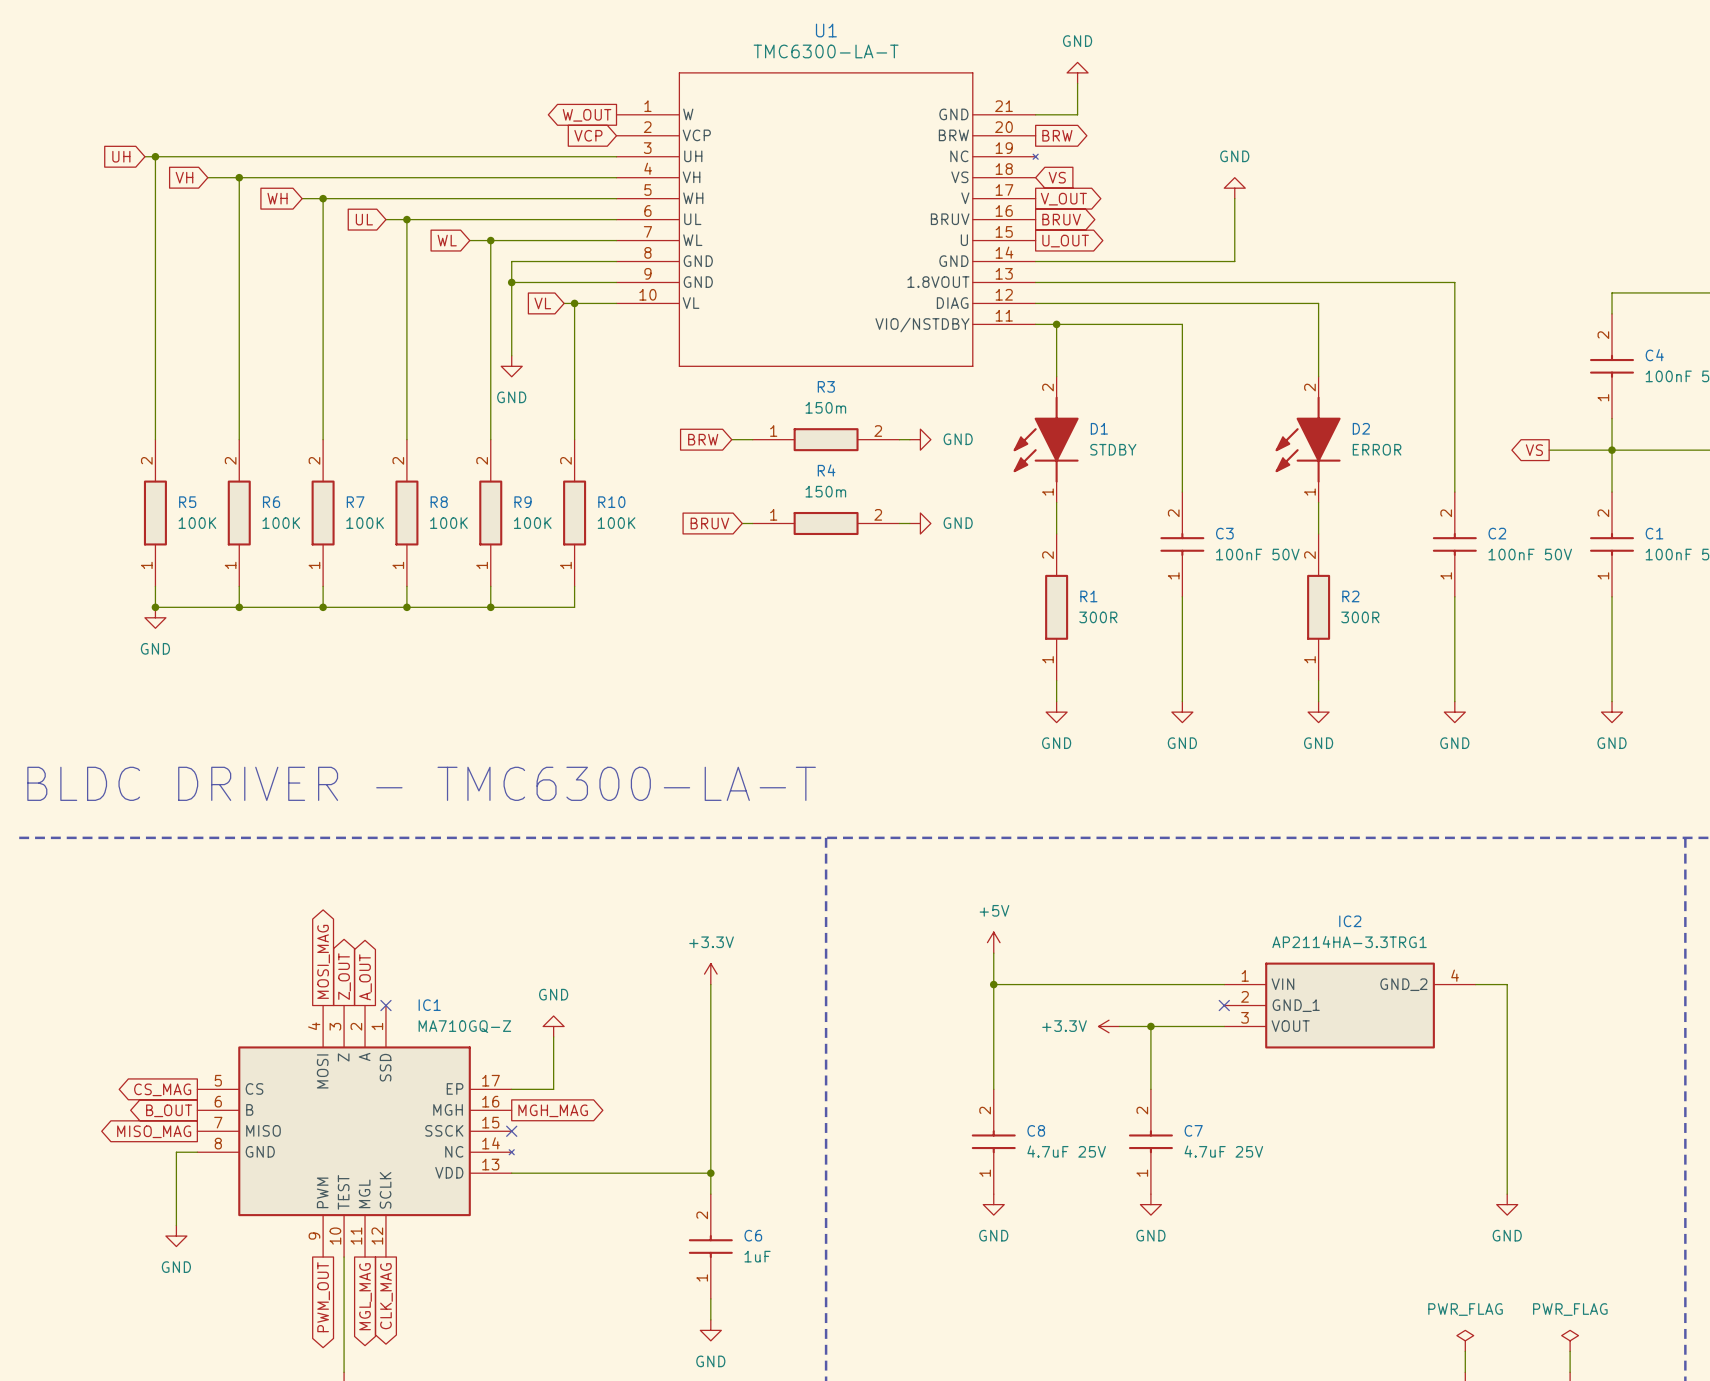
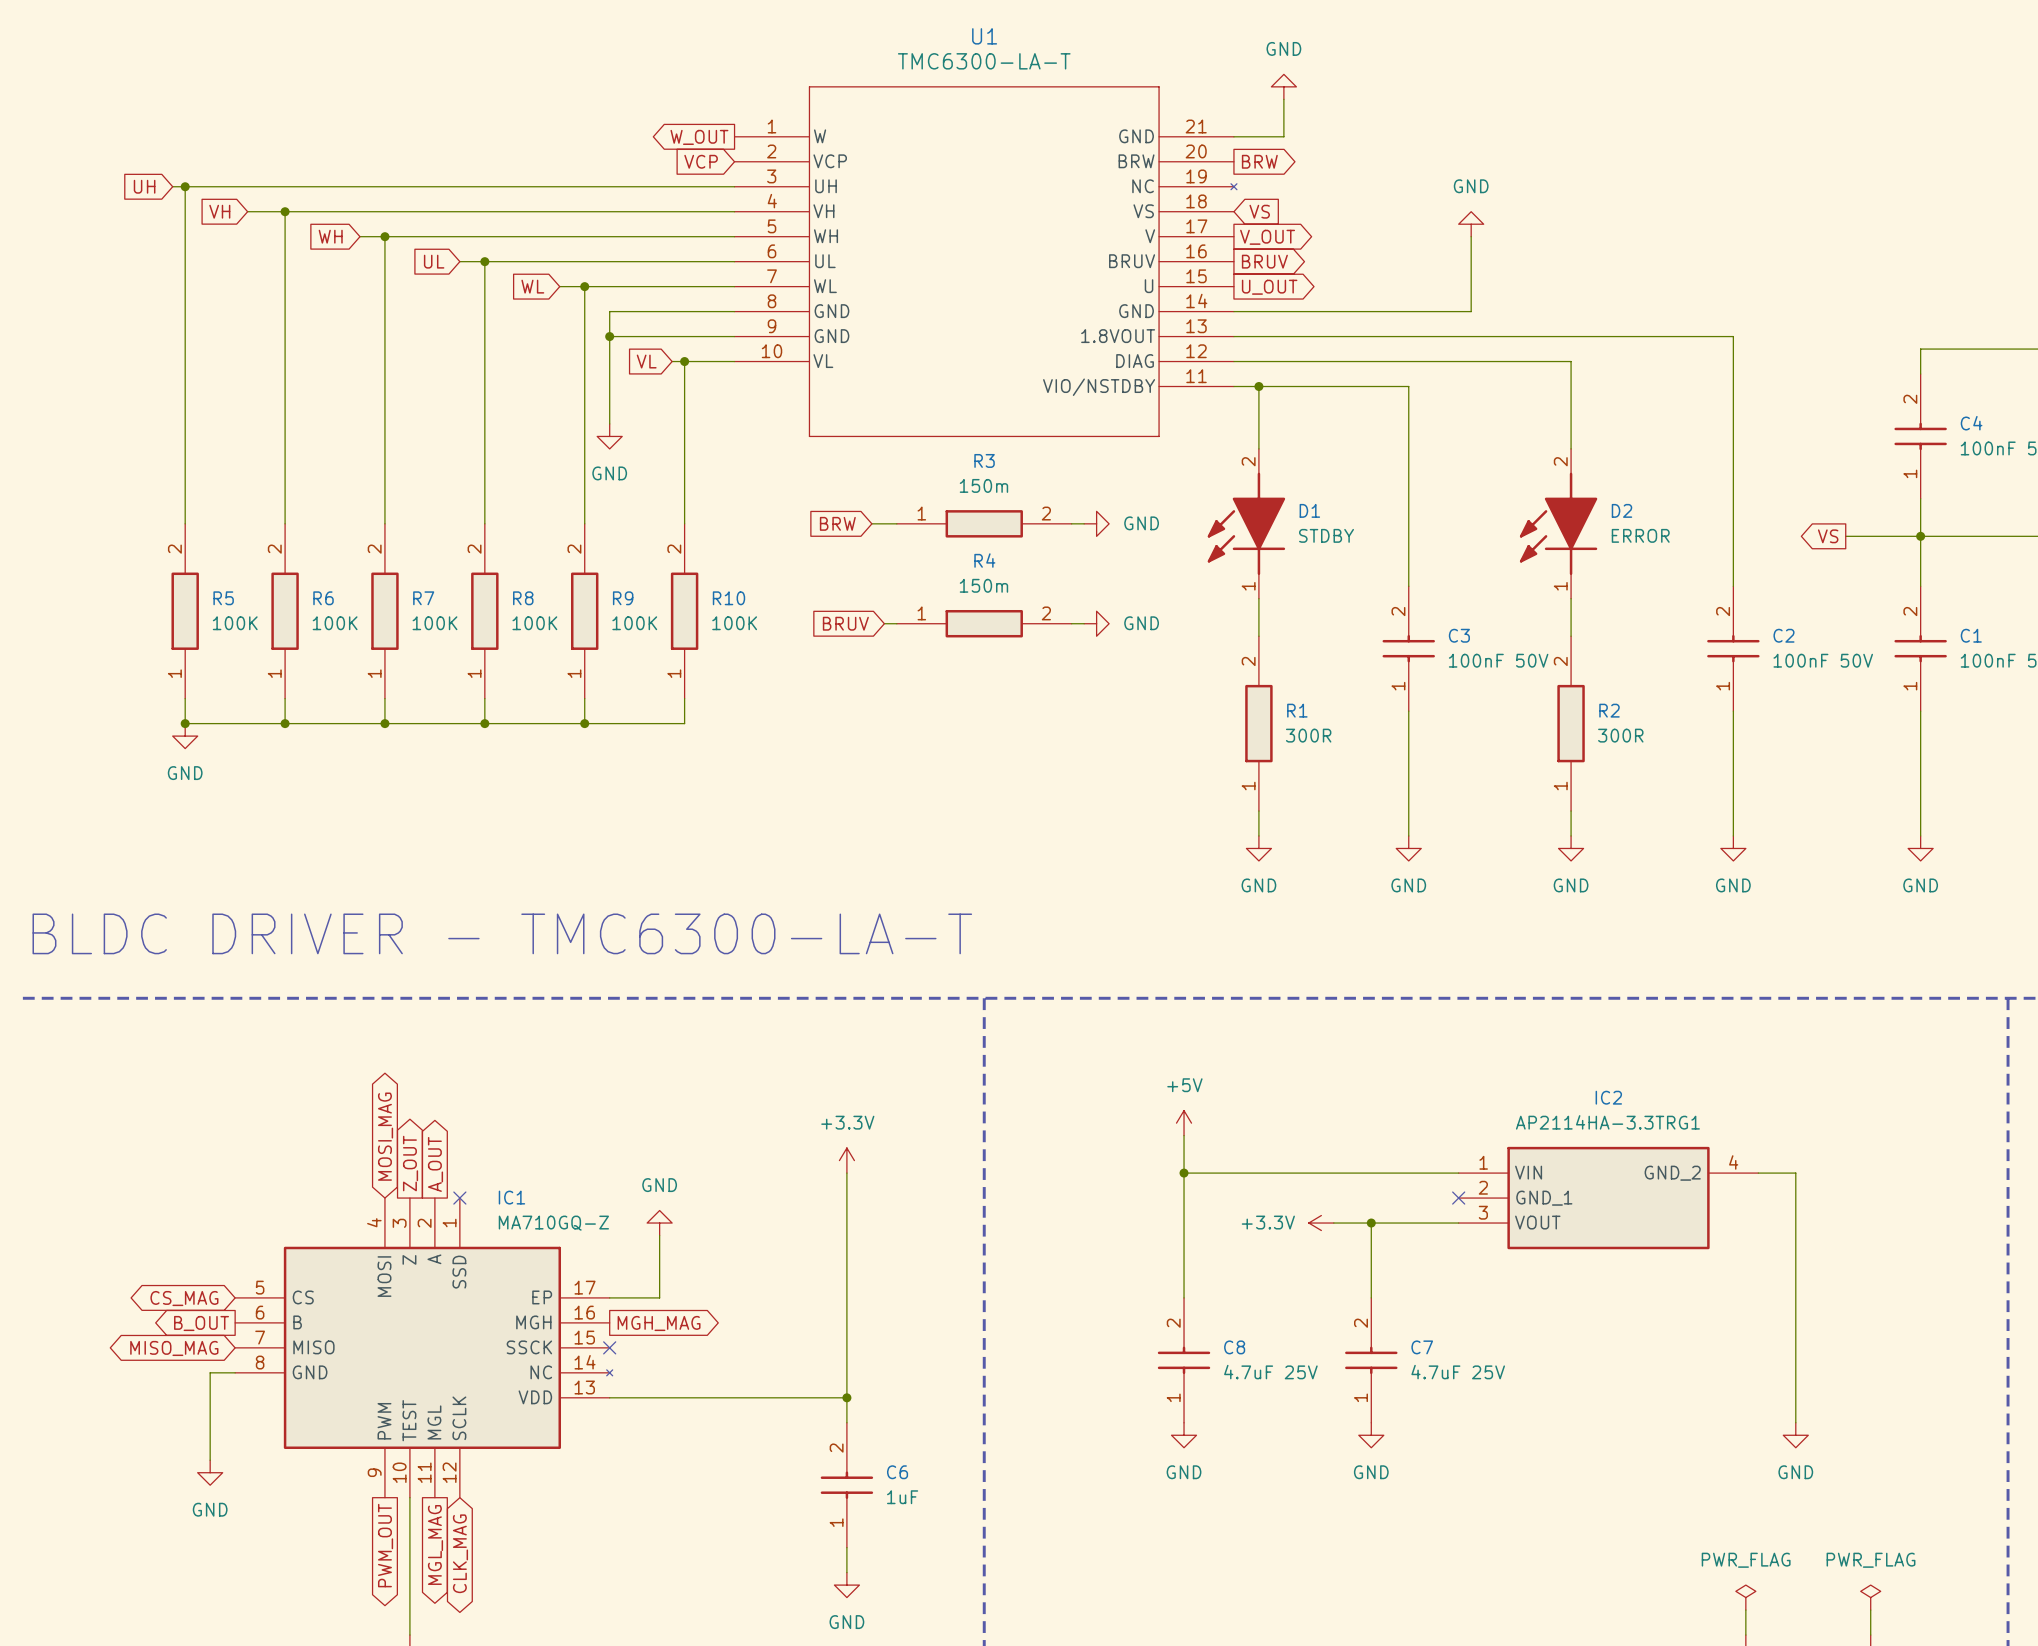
global label shape: output (323, 961) -> bidirectional (385, 1136)
global label shape: output (162, 1089) -> bidirectional (184, 1298)
global label shape: output (154, 1131) -> bidirectional (174, 1348)
global label shape: output (386, 1296) -> bidirectional (460, 1553)

